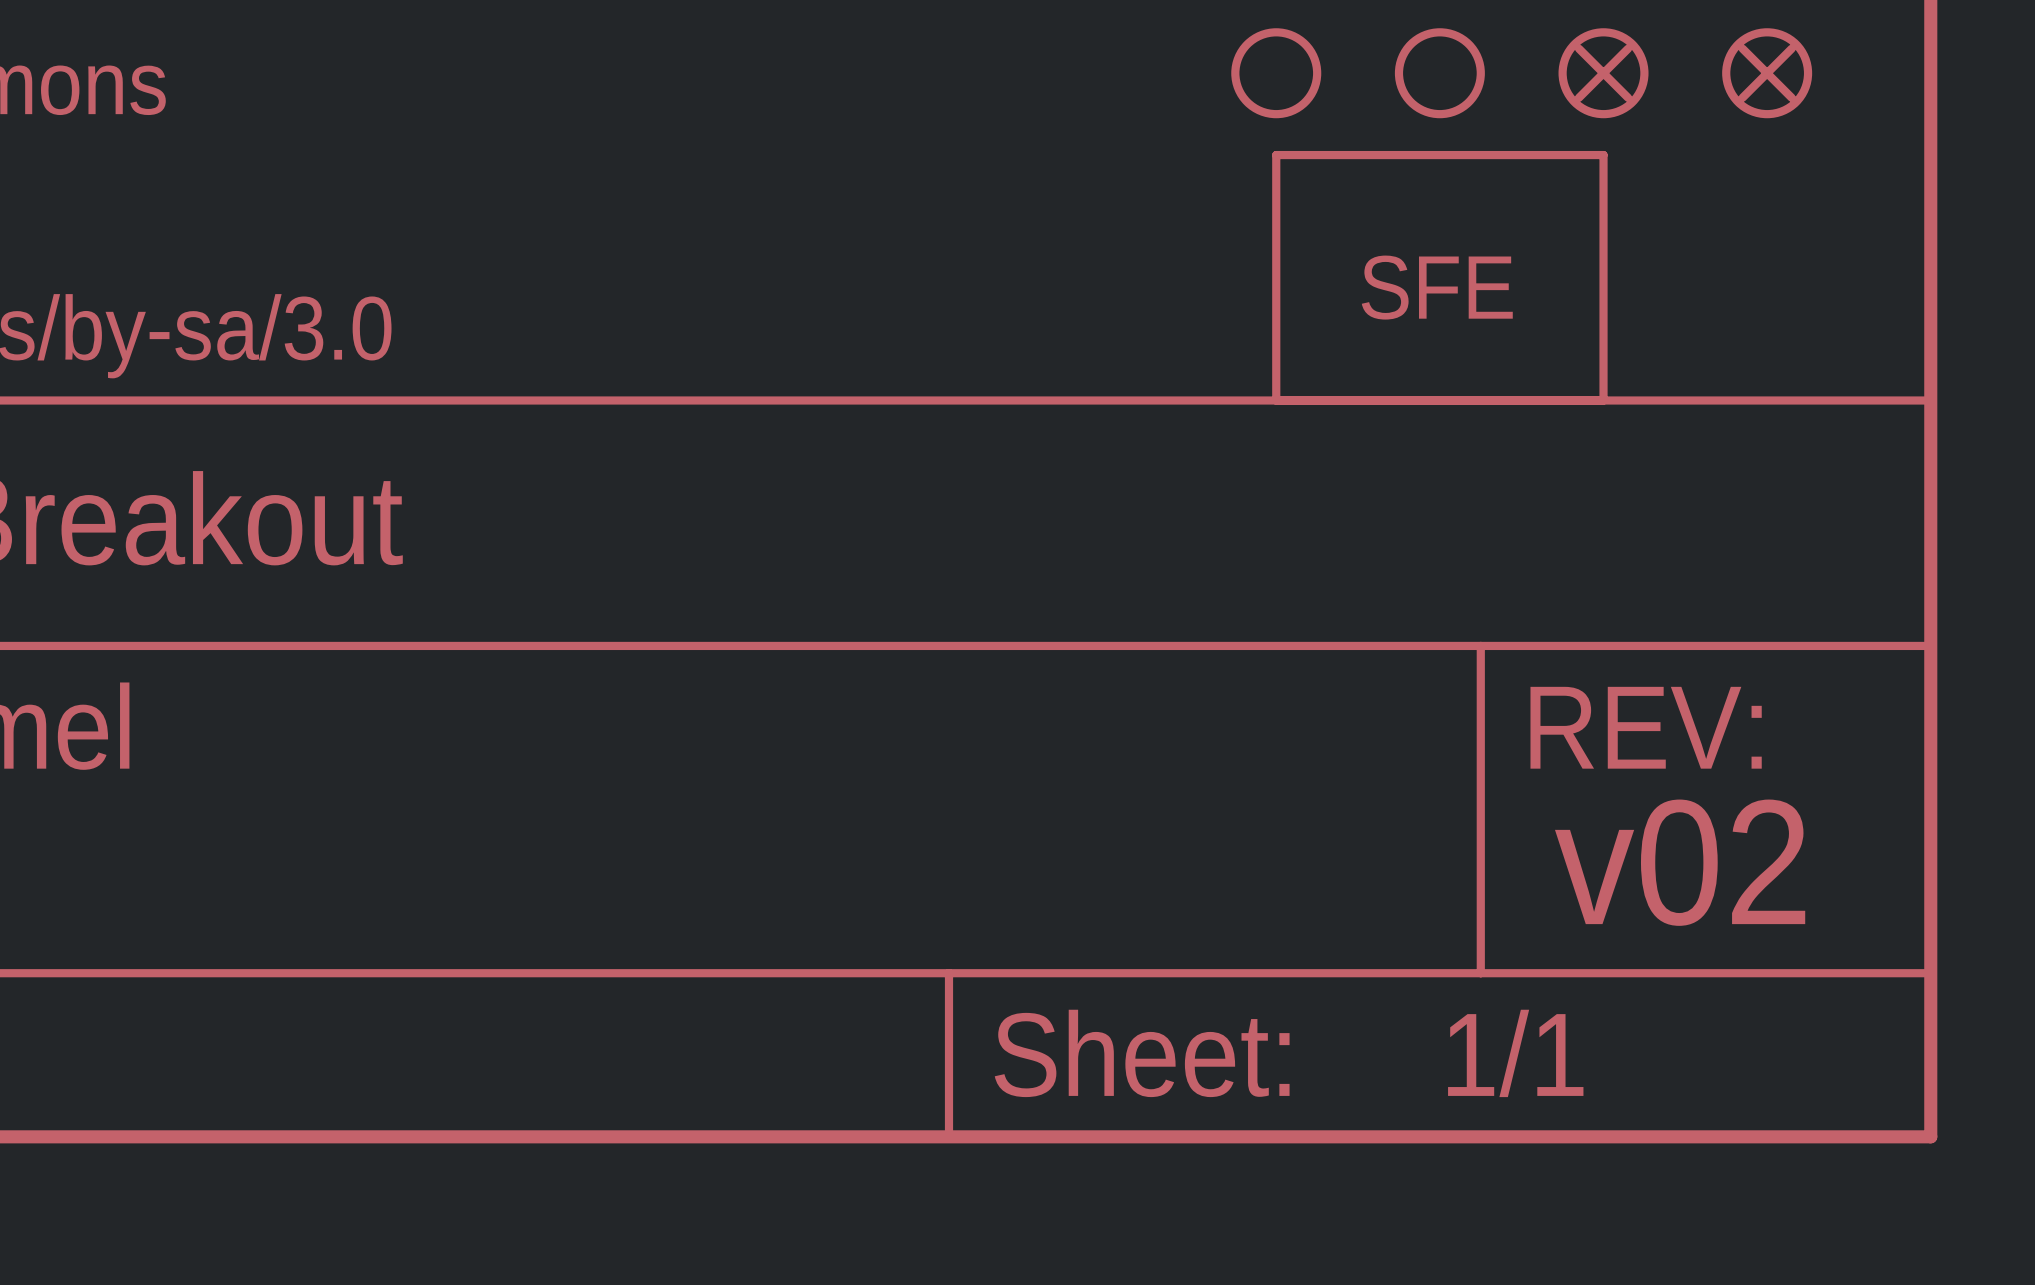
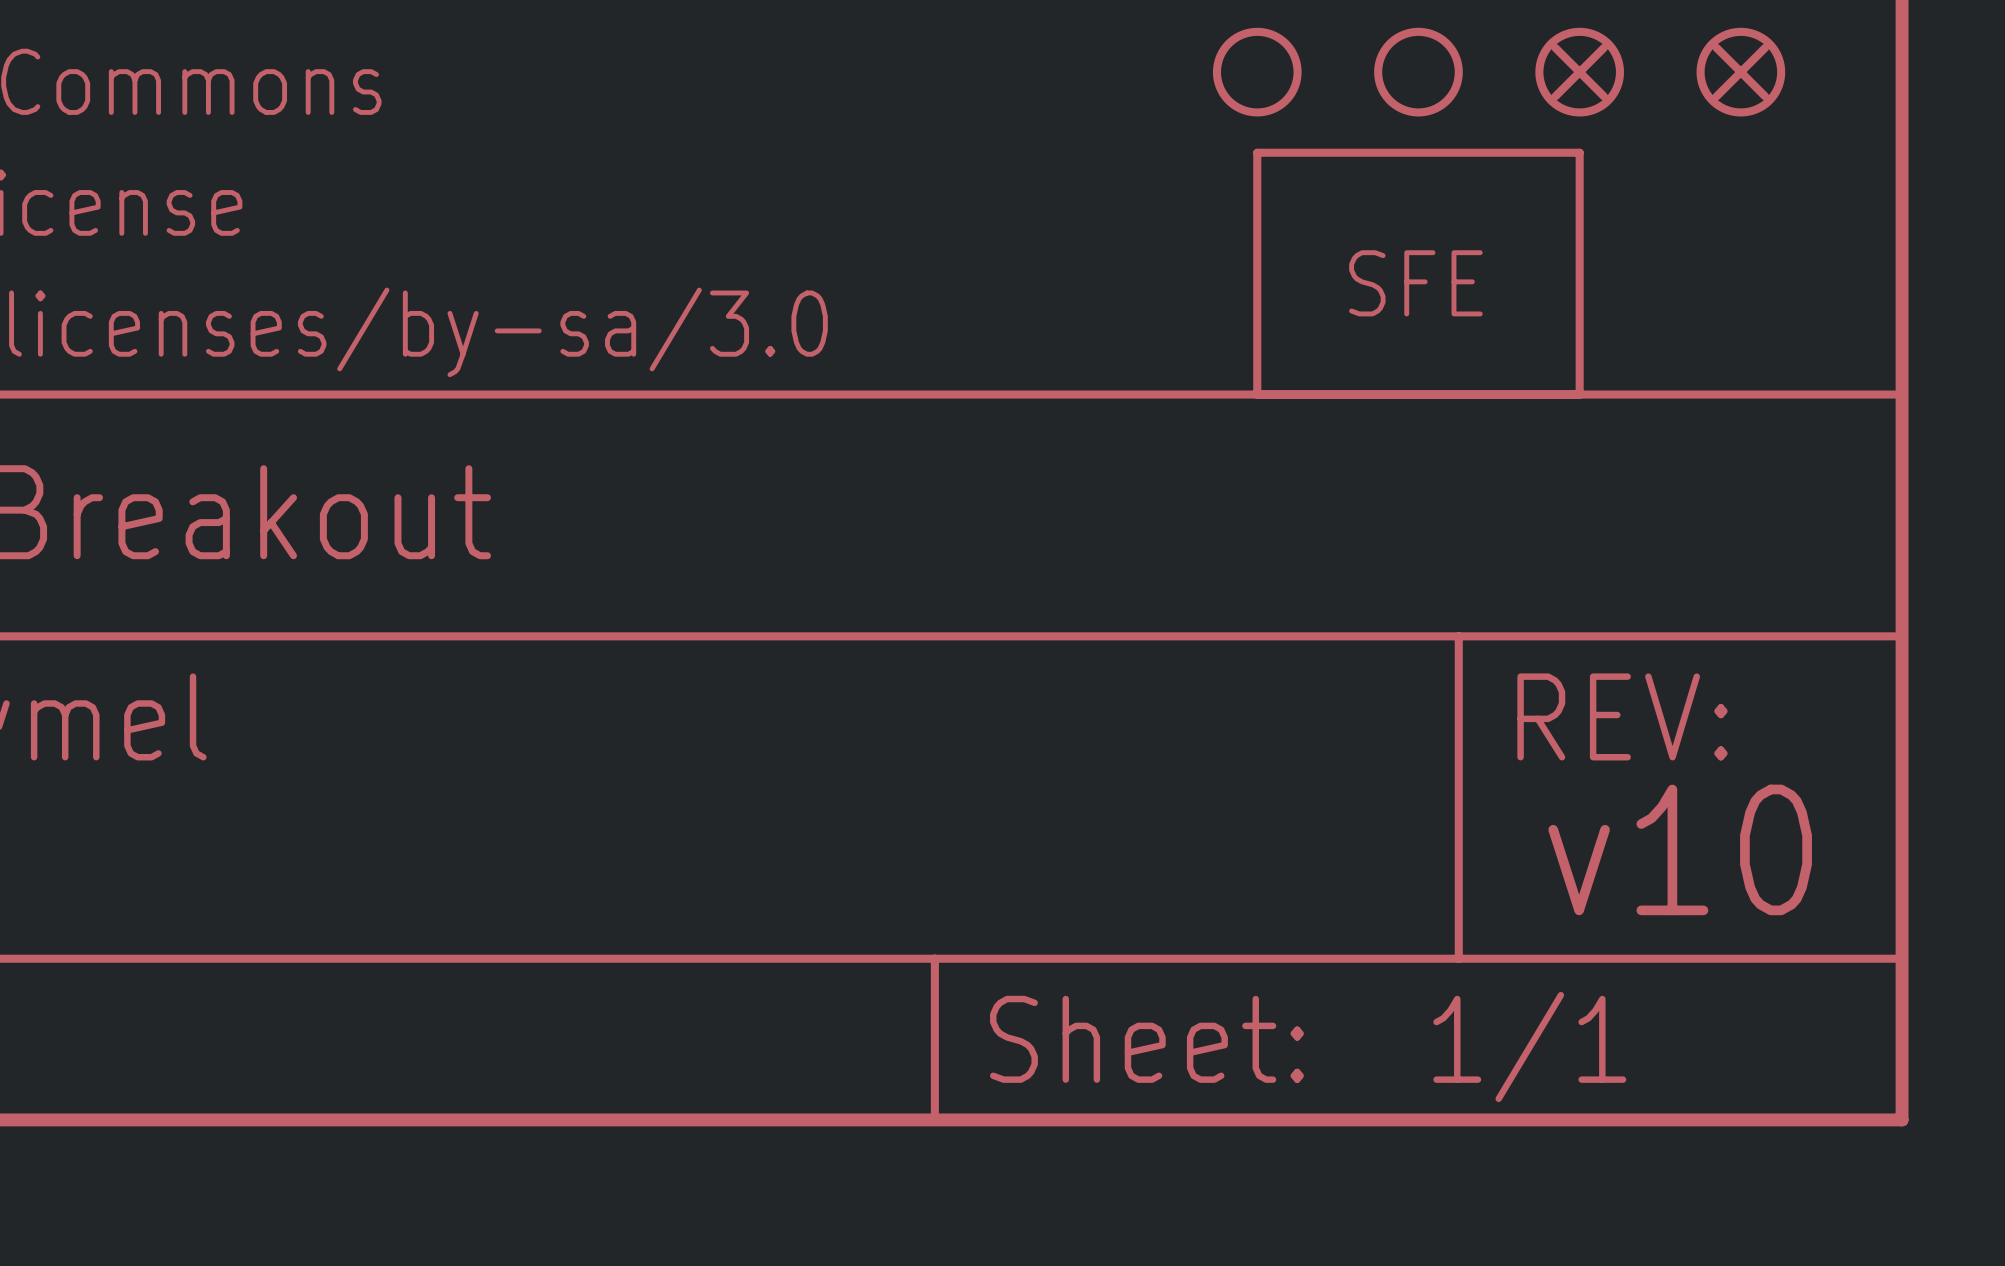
text: v02 (1680, 862) -> v10 (1680, 849)

